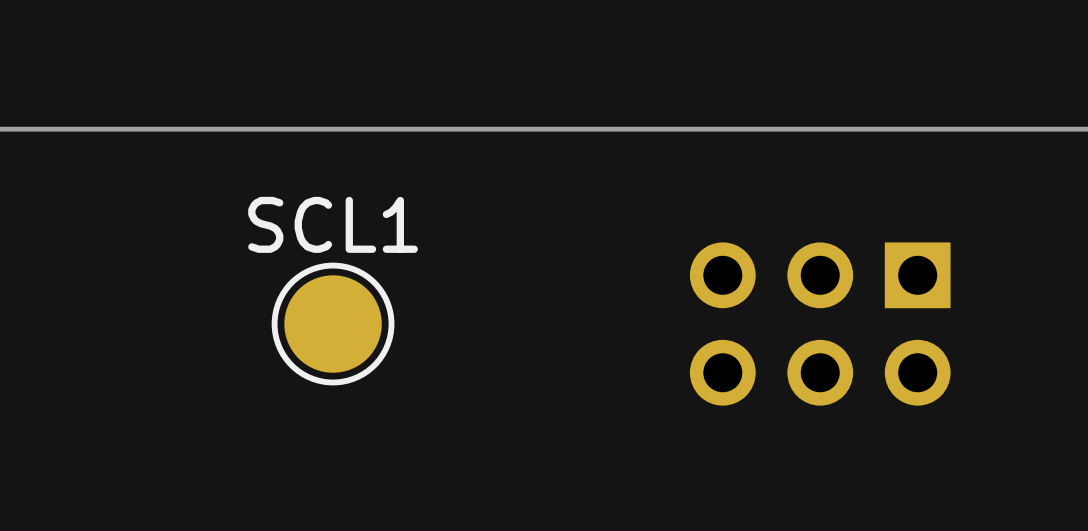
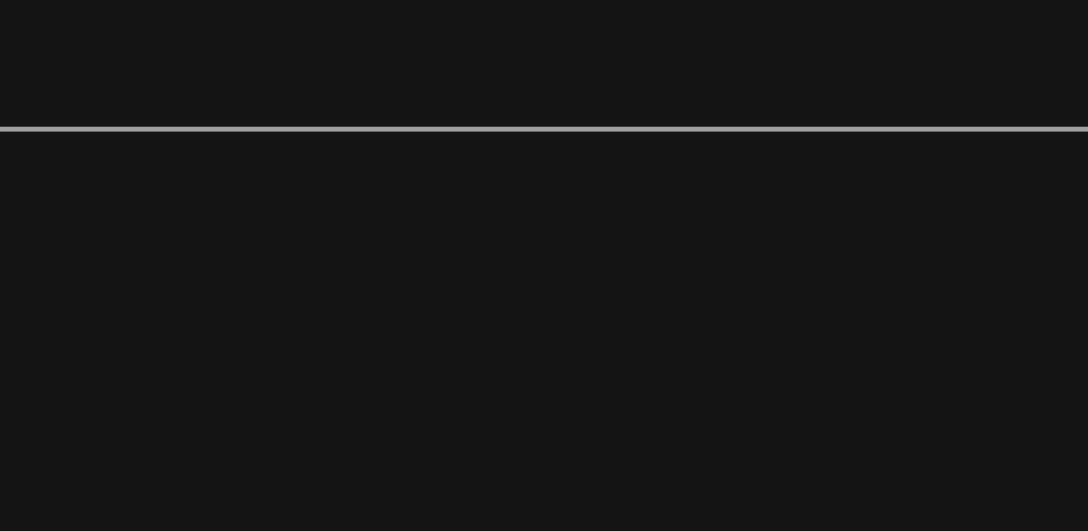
SCL1: (333, 324) -> none
part: (820, 324) -> none

